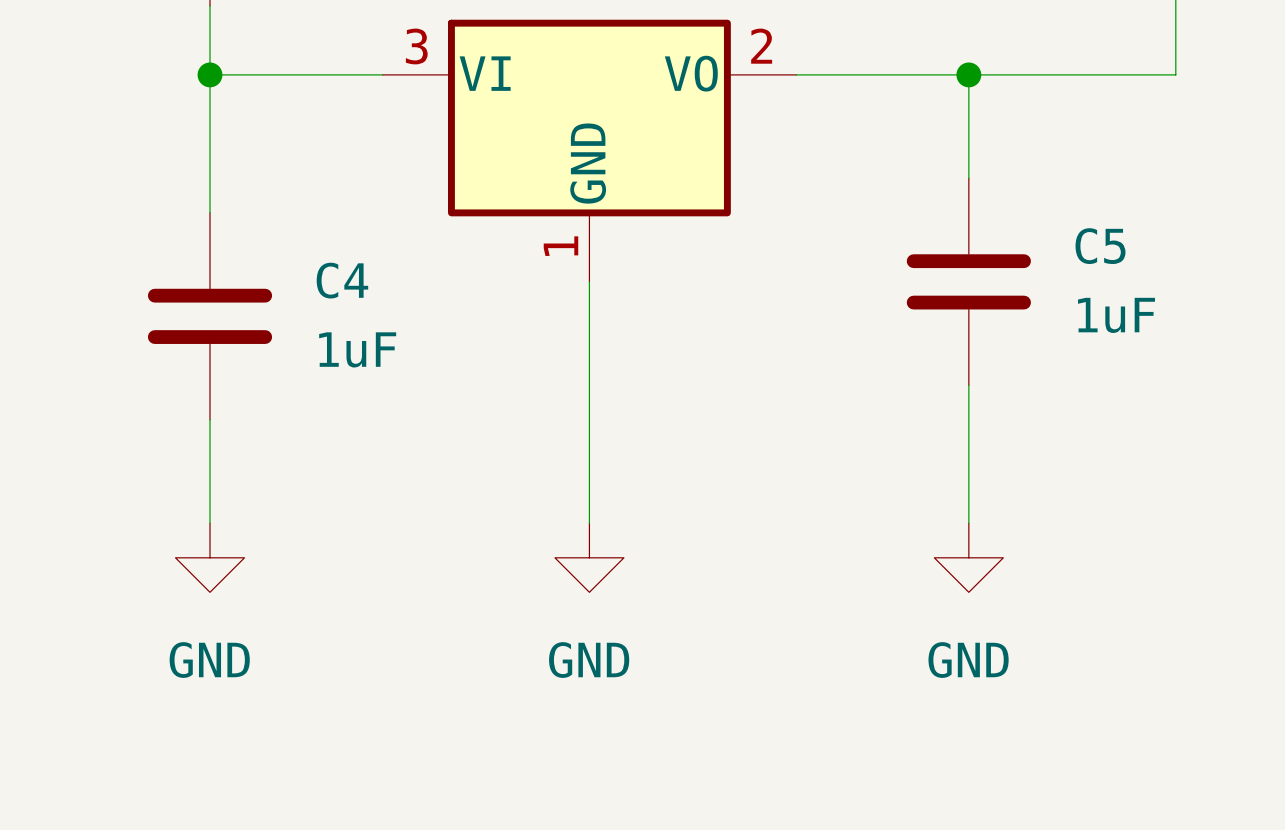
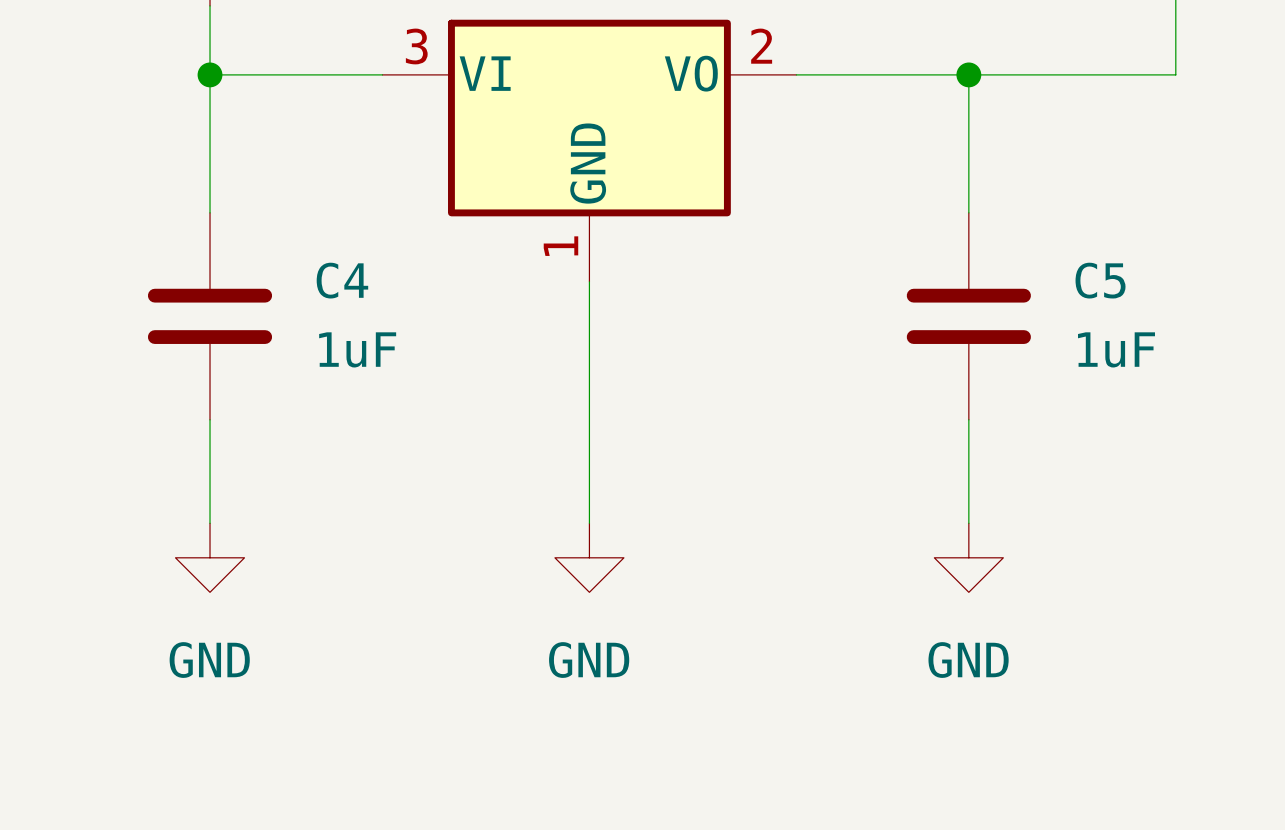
C5 position: (968, 281) -> (968, 316)

